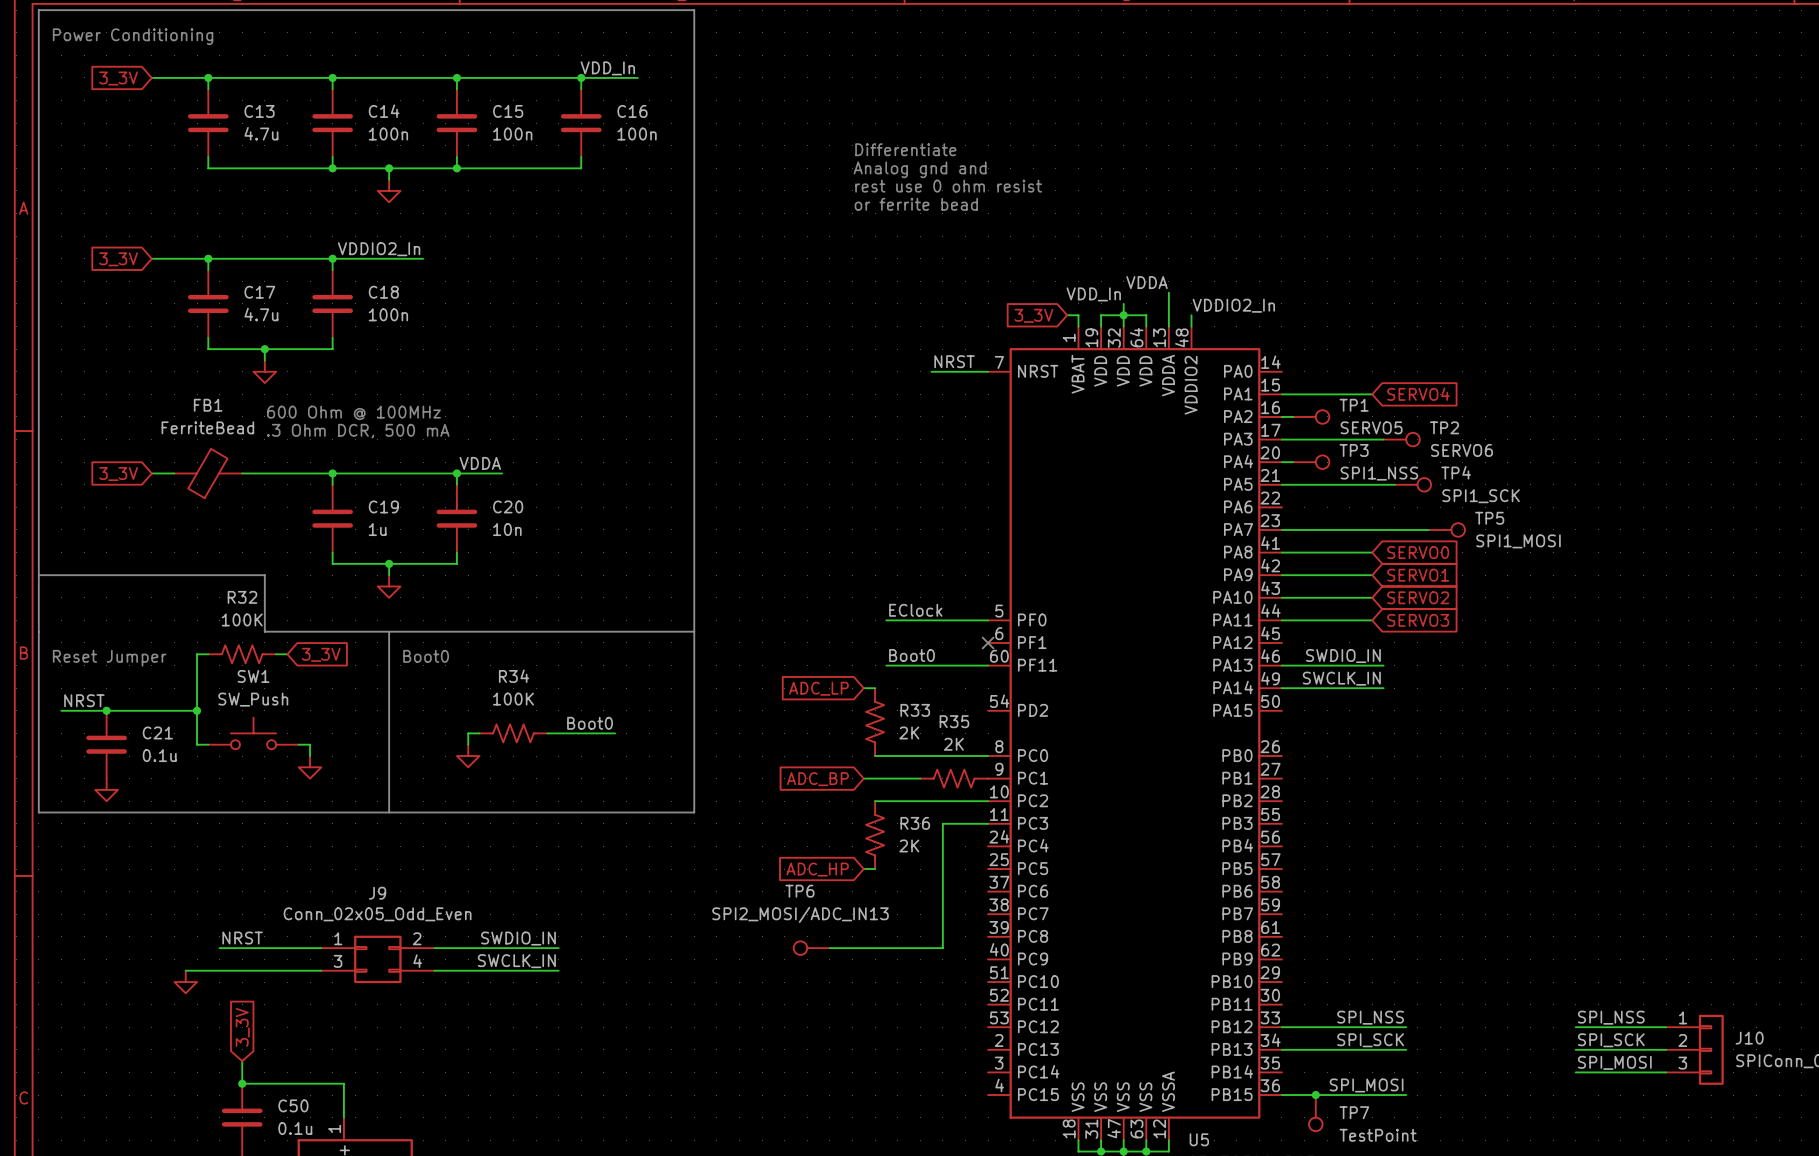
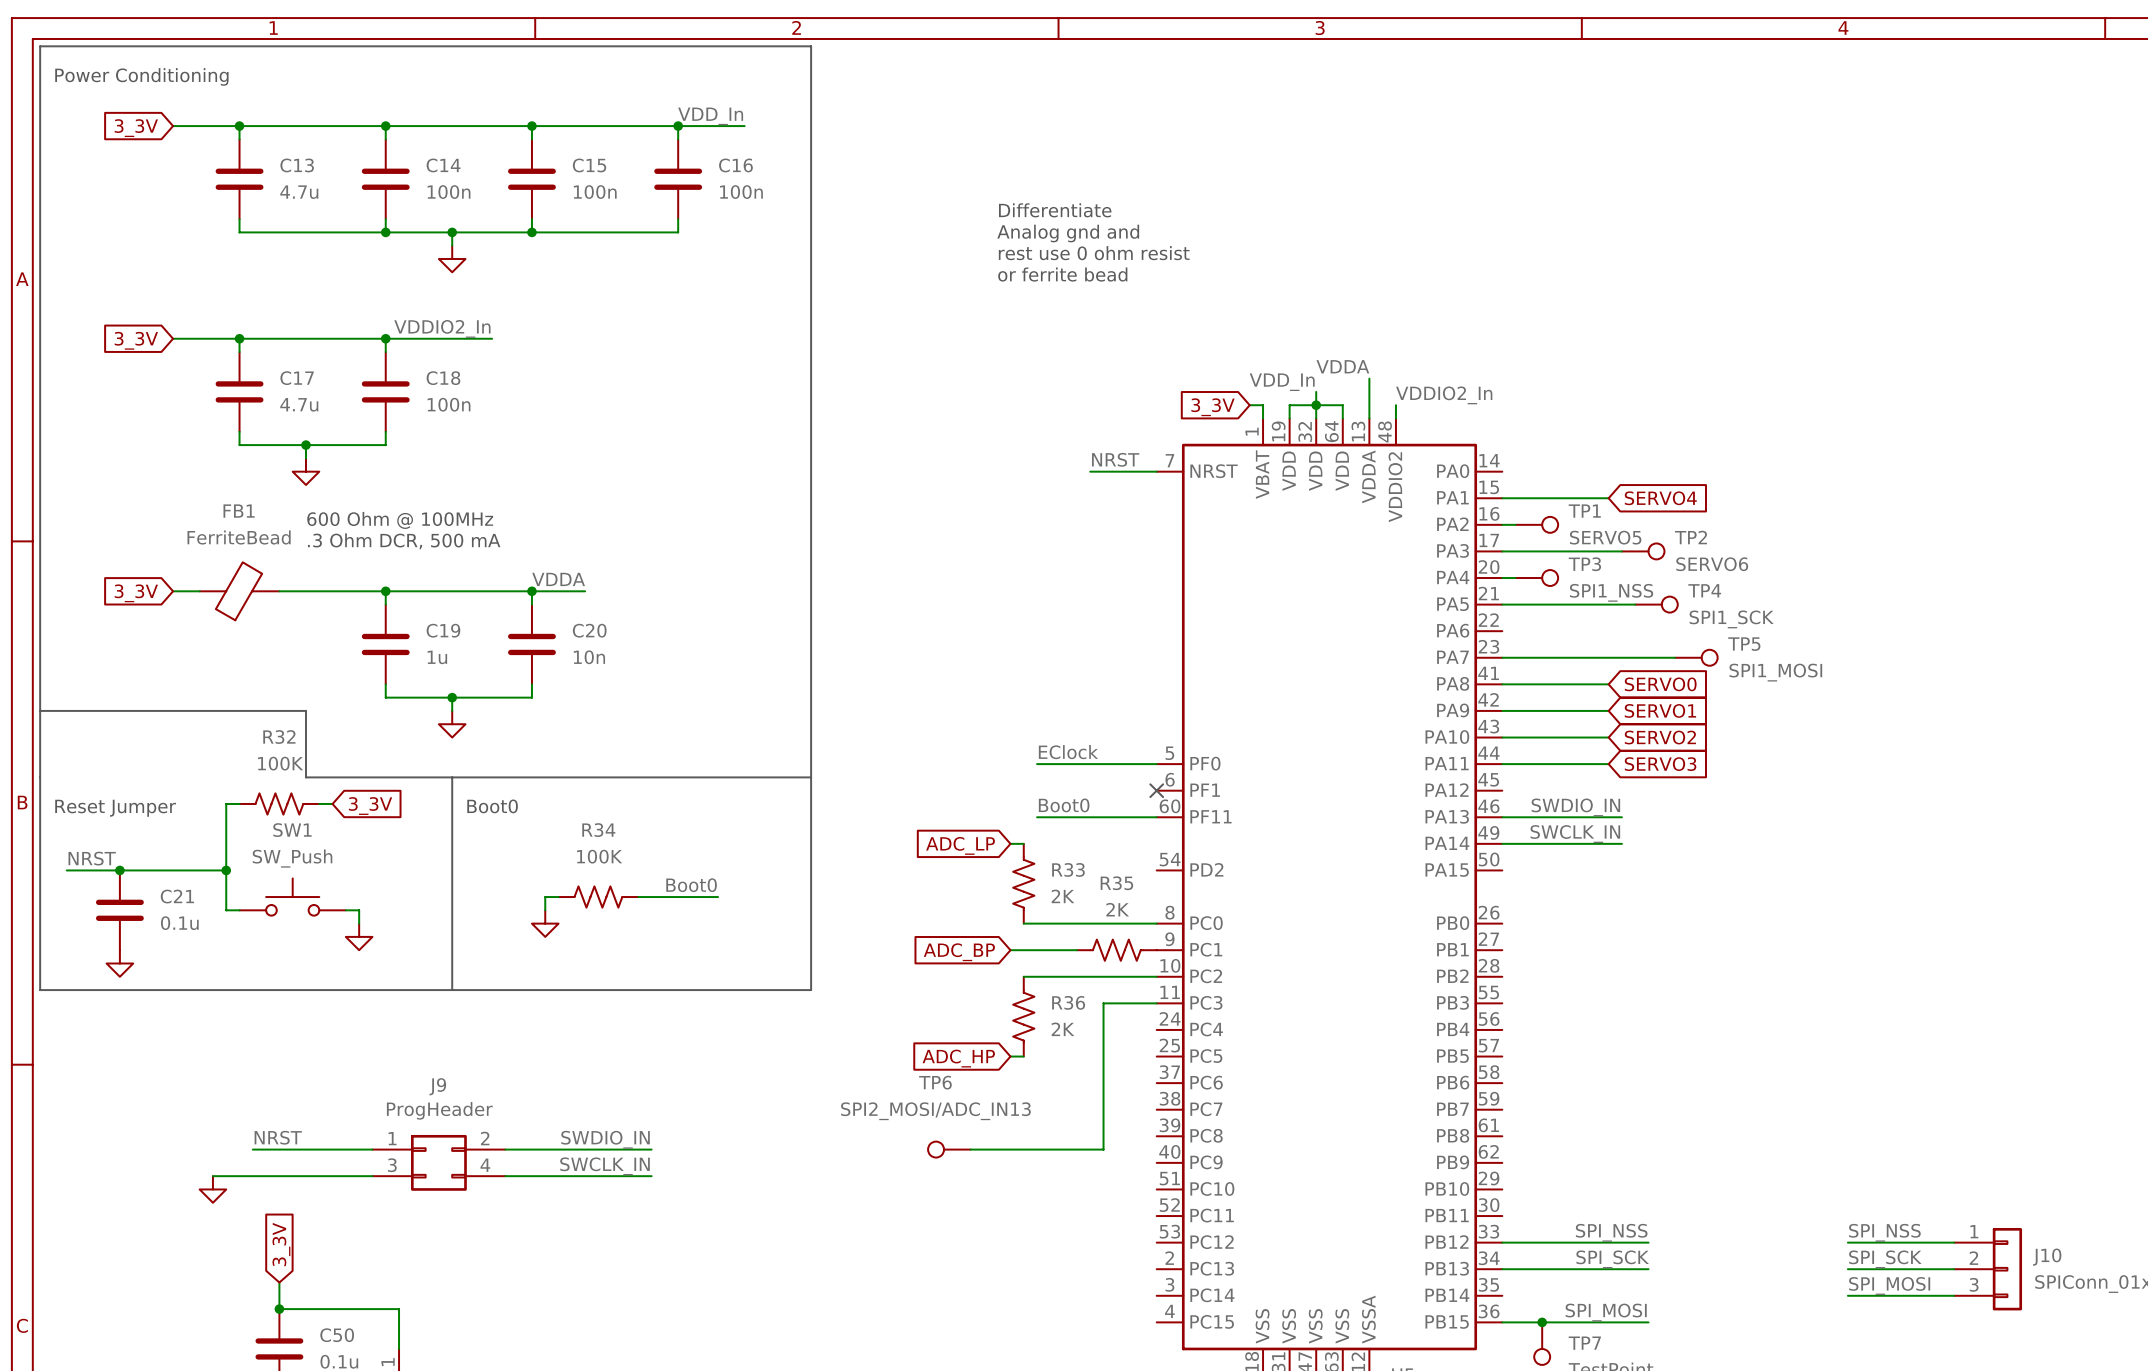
J9 value: Conn_02x05_Odd_Even (377, 914) -> ProgHeader (439, 1110)

